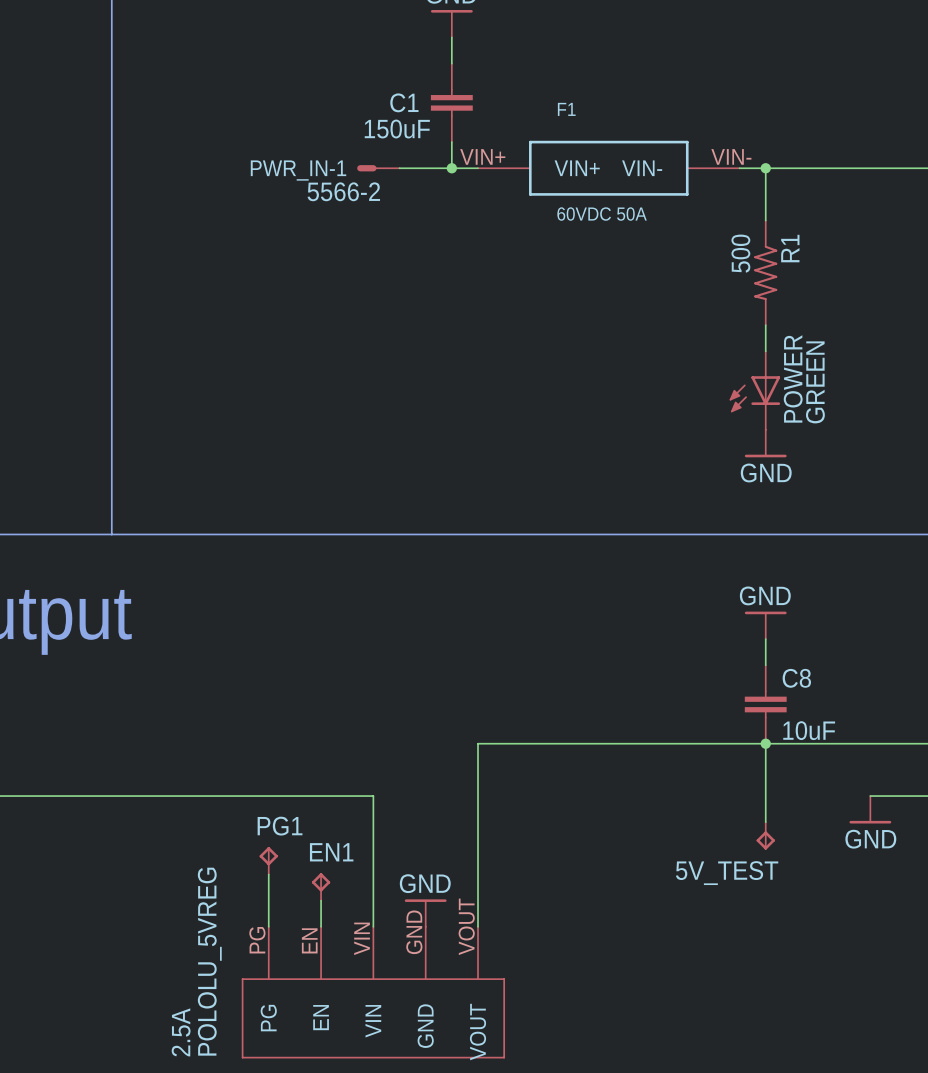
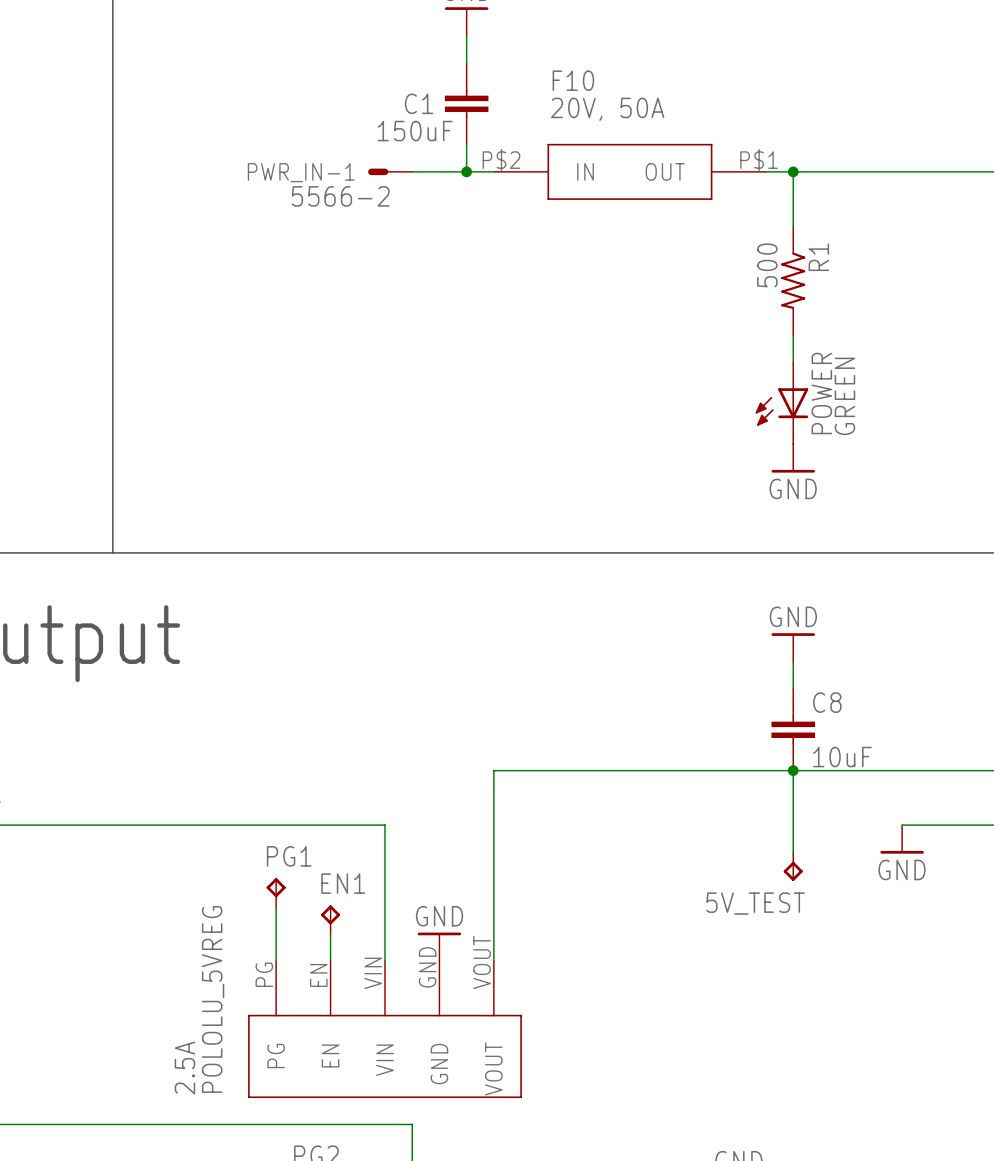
F1: 60VDC 50A (608, 168) -> none
F10: none -> 20V, 50A (629, 171)

